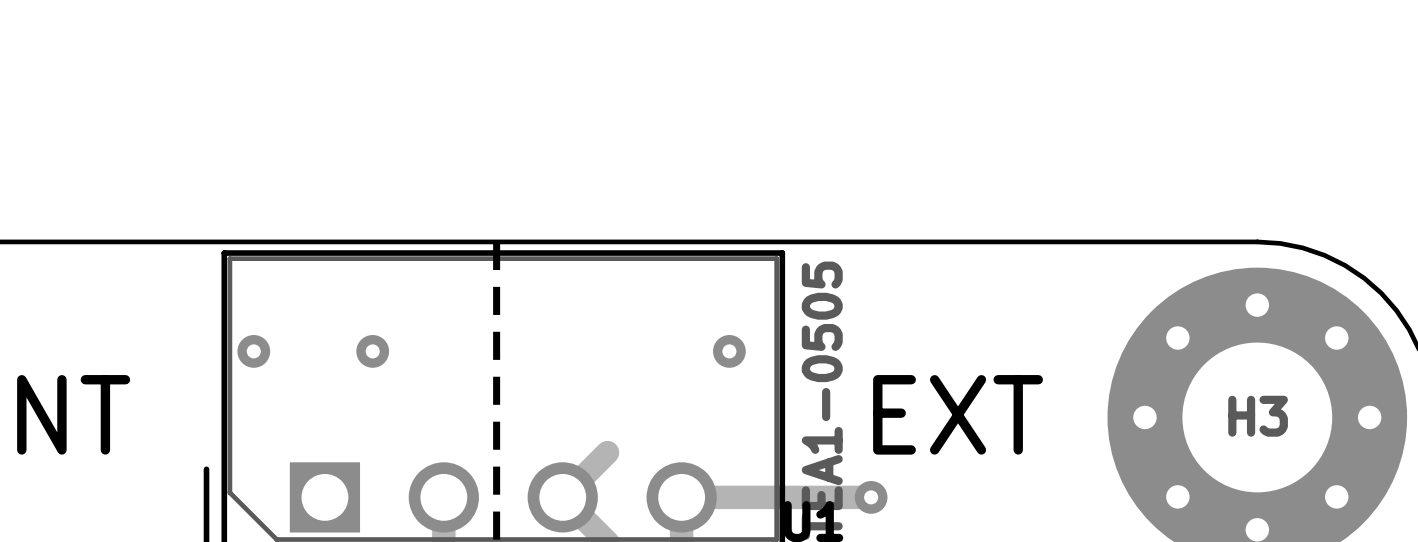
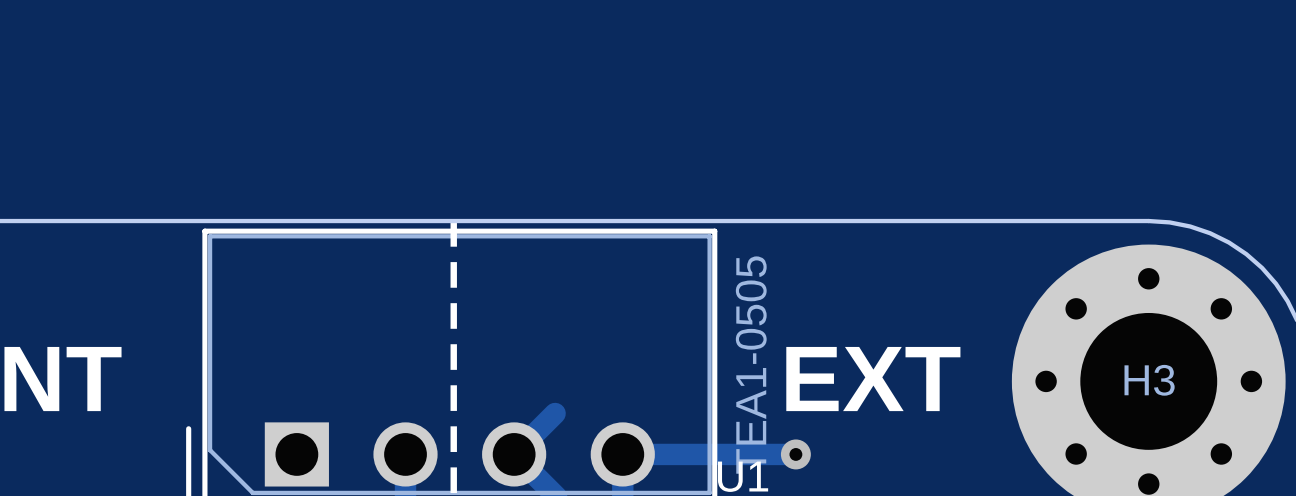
via: (253, 351) -> none
via: (372, 351) -> none
via: (729, 351) -> none

